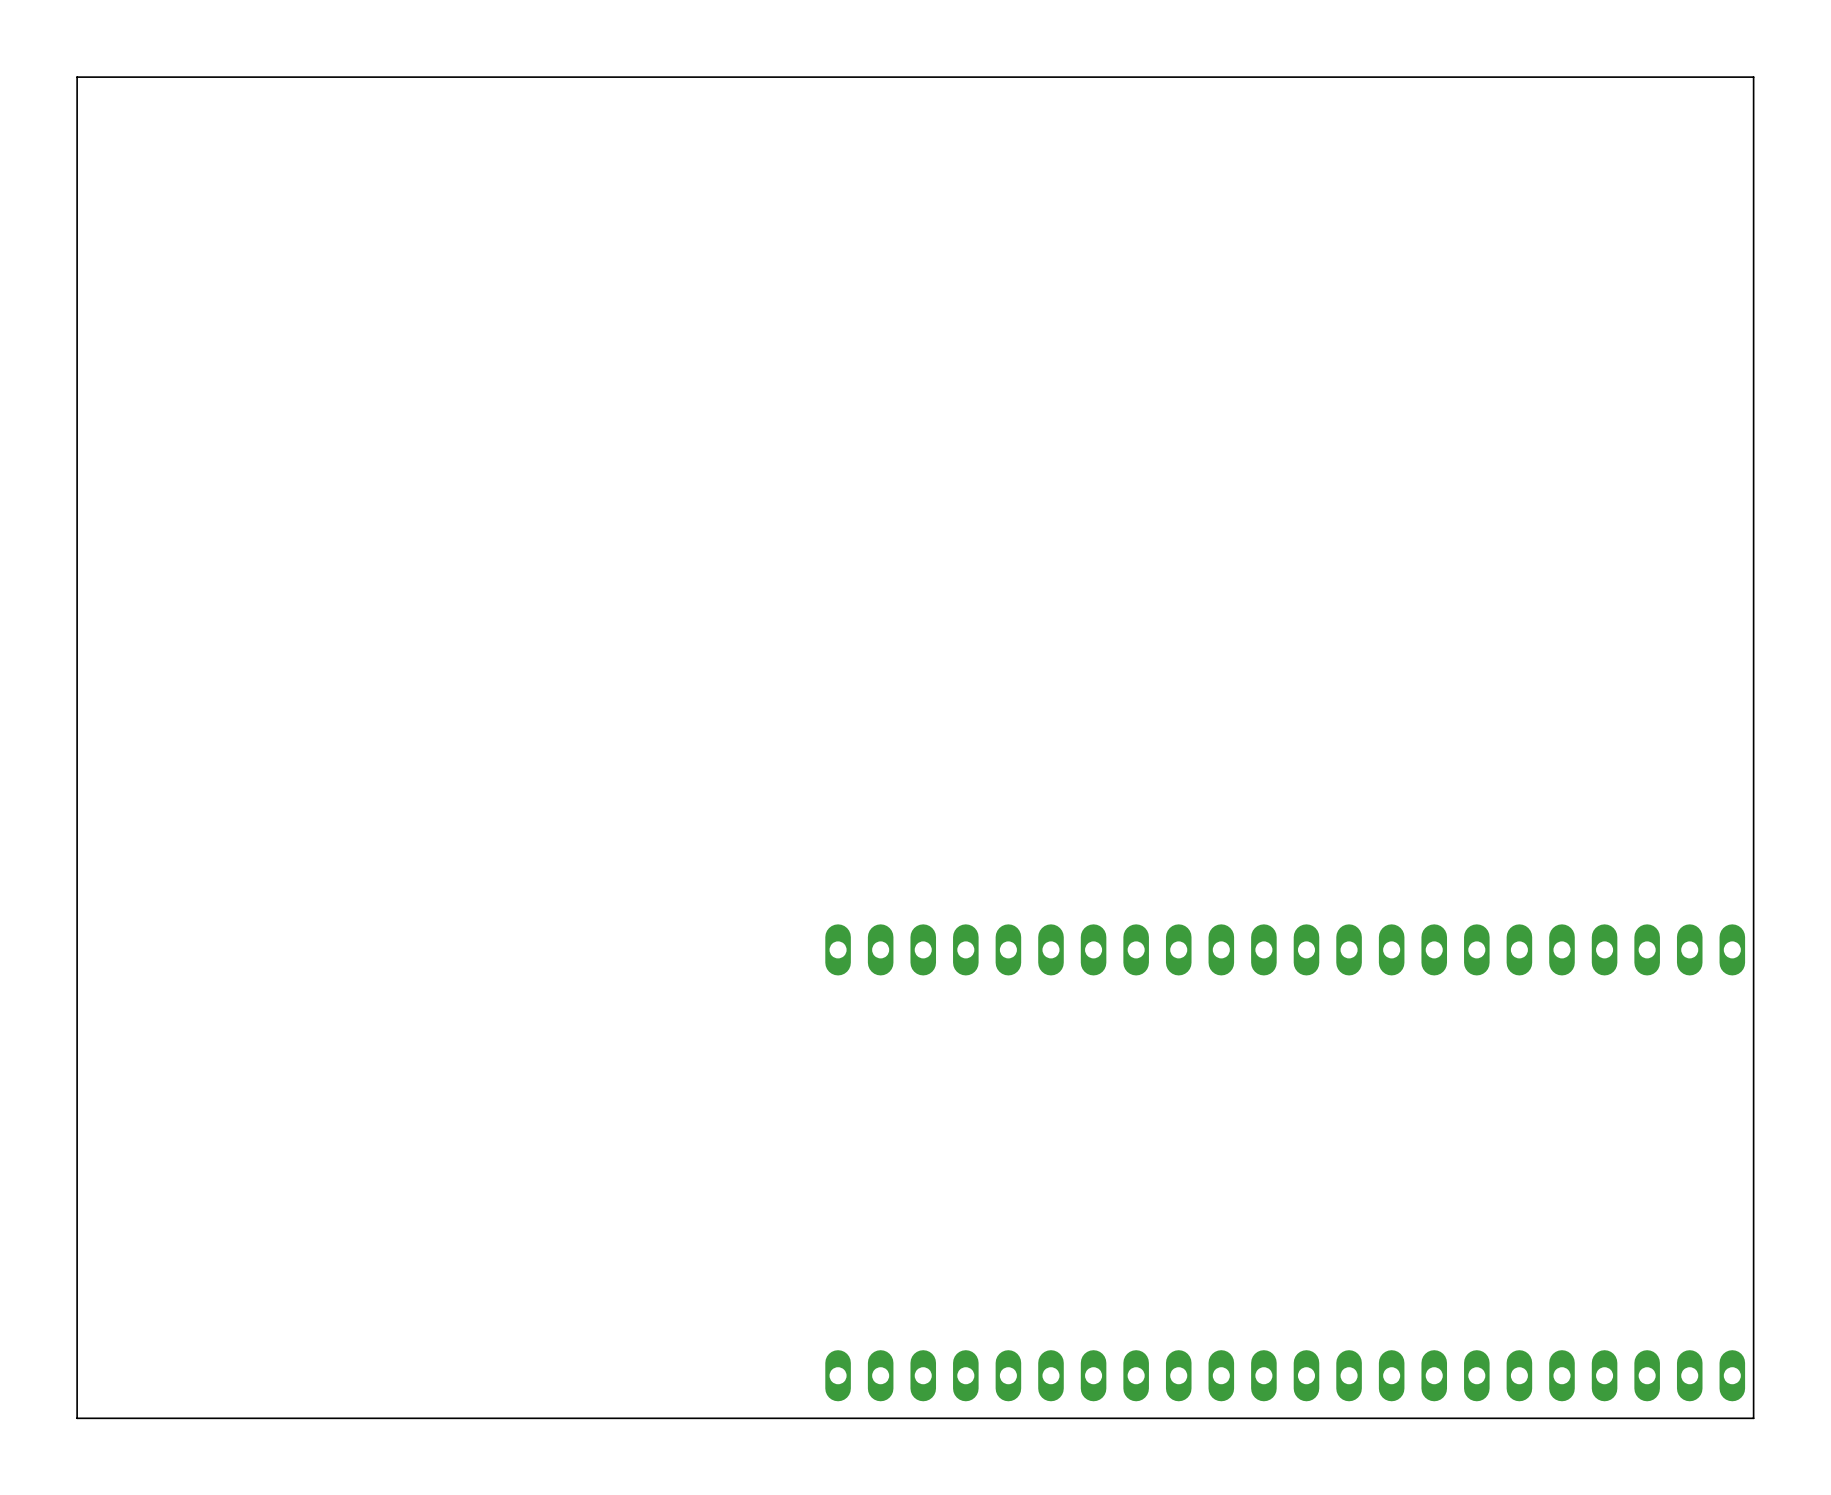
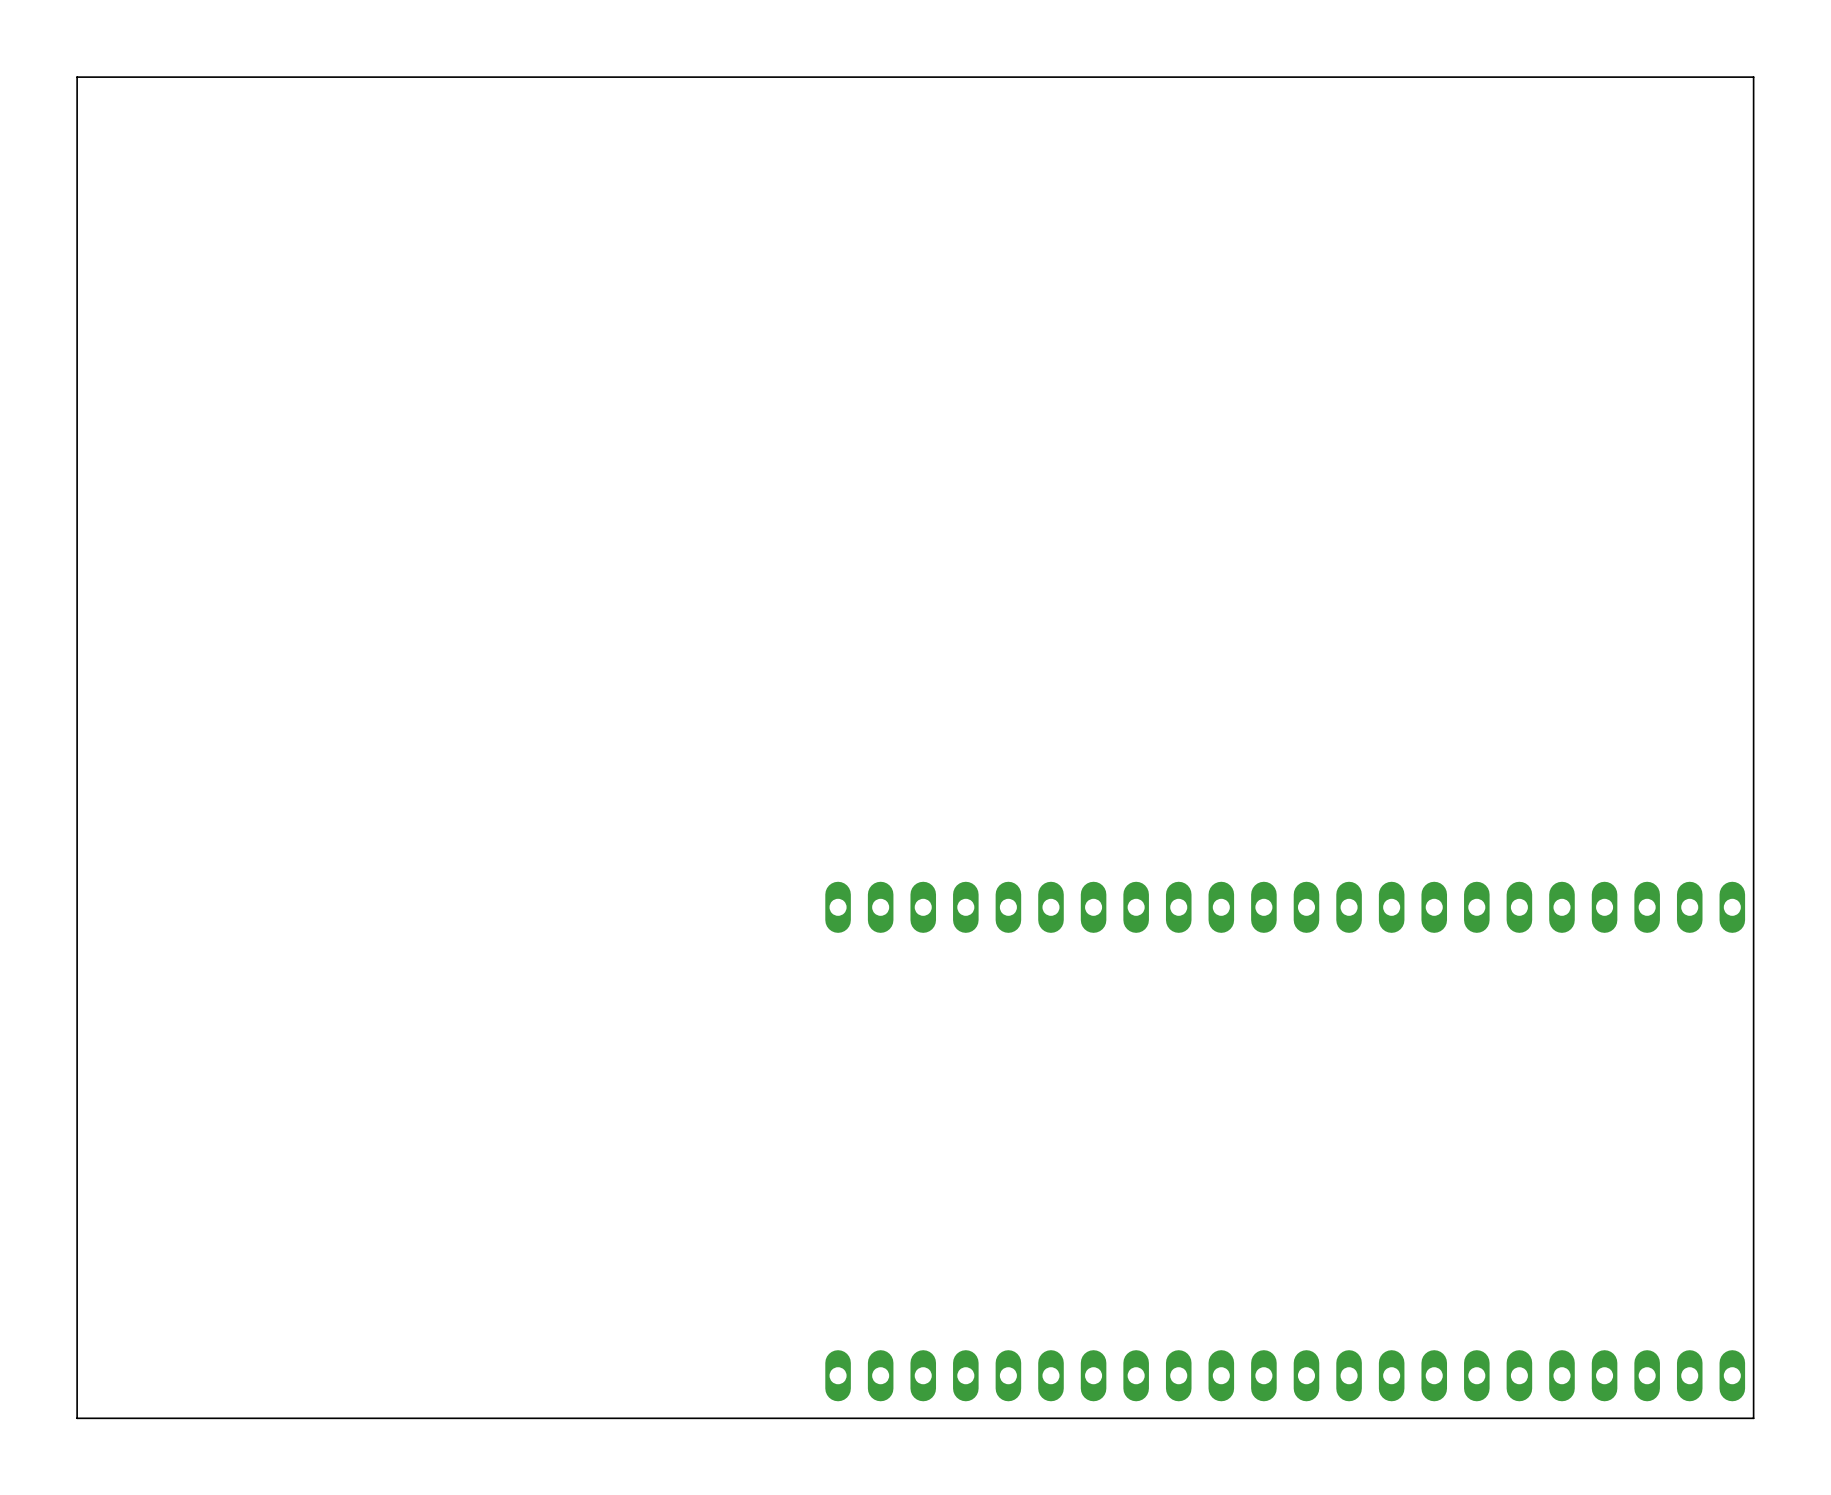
part position: (1285, 949) -> (1285, 907)

